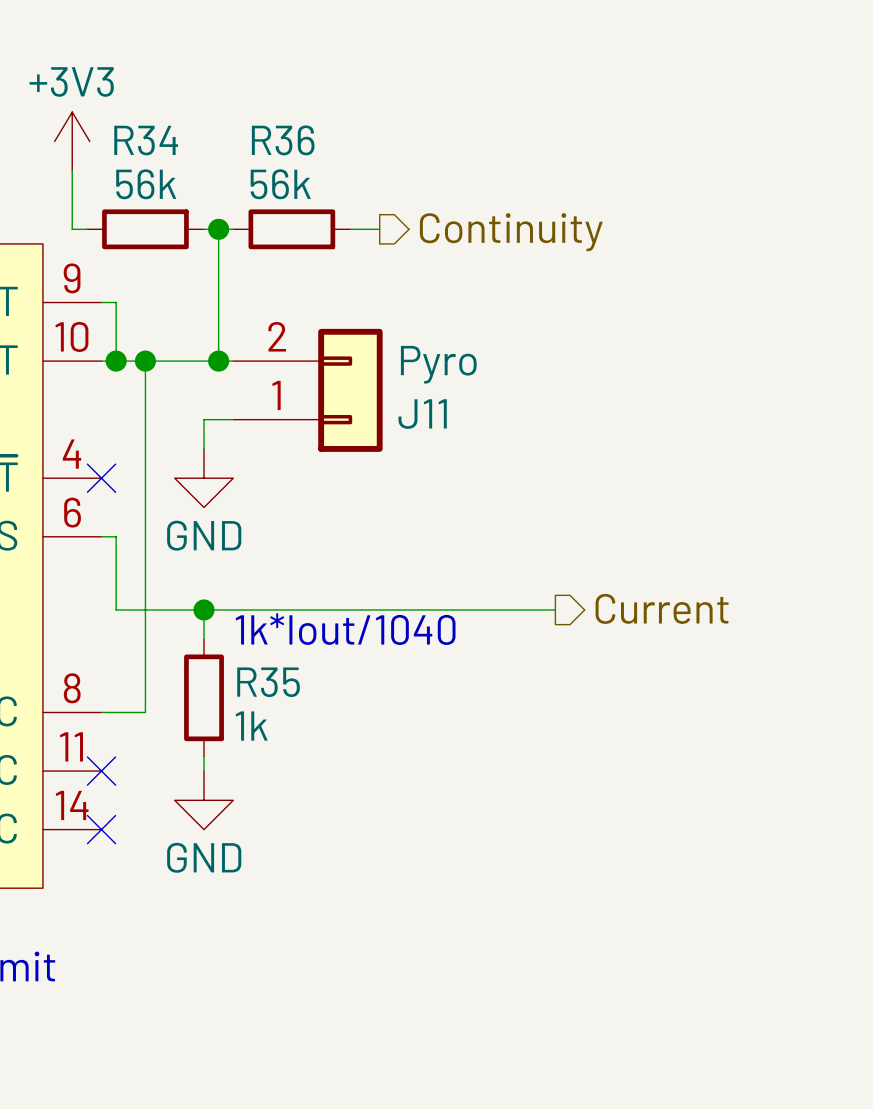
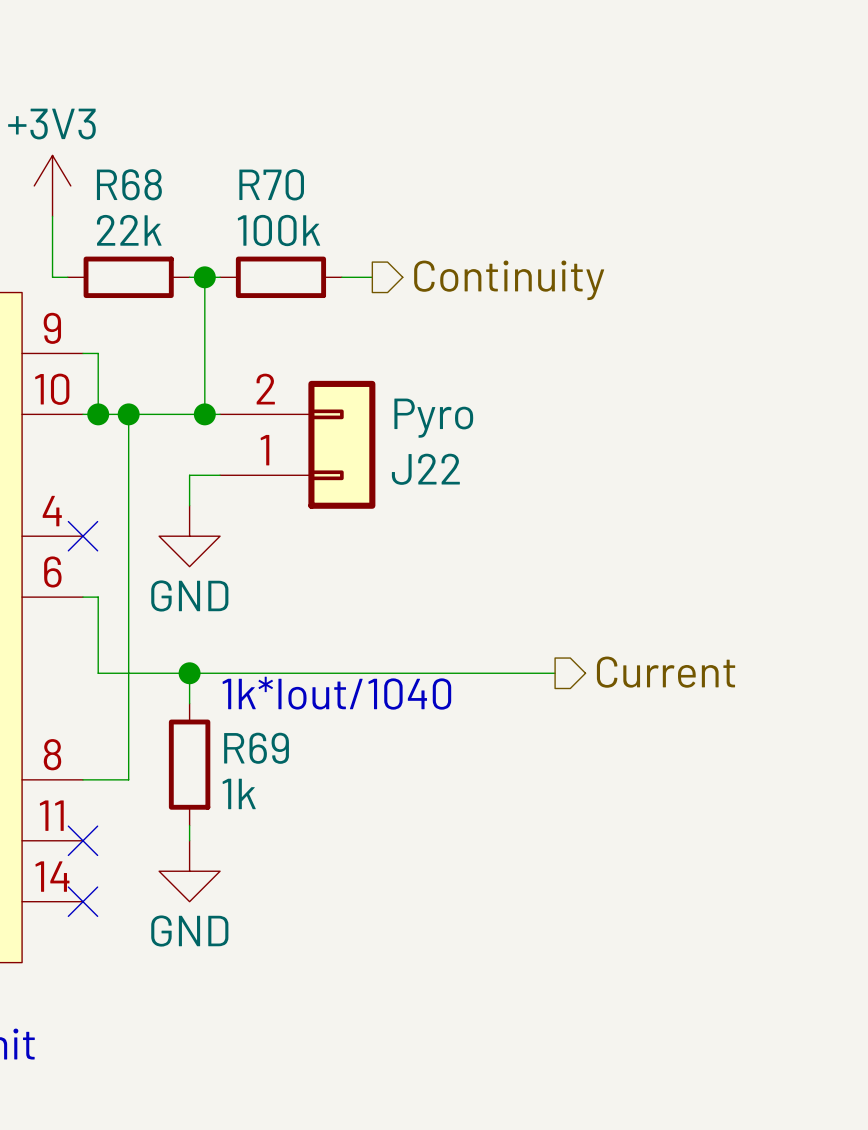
R34 name: R34 (146, 140) -> R68 (129, 184)
R36 name: R36 (283, 140) -> R70 (271, 184)
R34 value: 56k (146, 184) -> 22k (129, 230)
R36 value: 56k (280, 184) -> 100k (278, 230)
J11 name: J11 (422, 414) -> J22 (425, 469)
R35 name: R35 (268, 682) -> R69 (256, 748)

